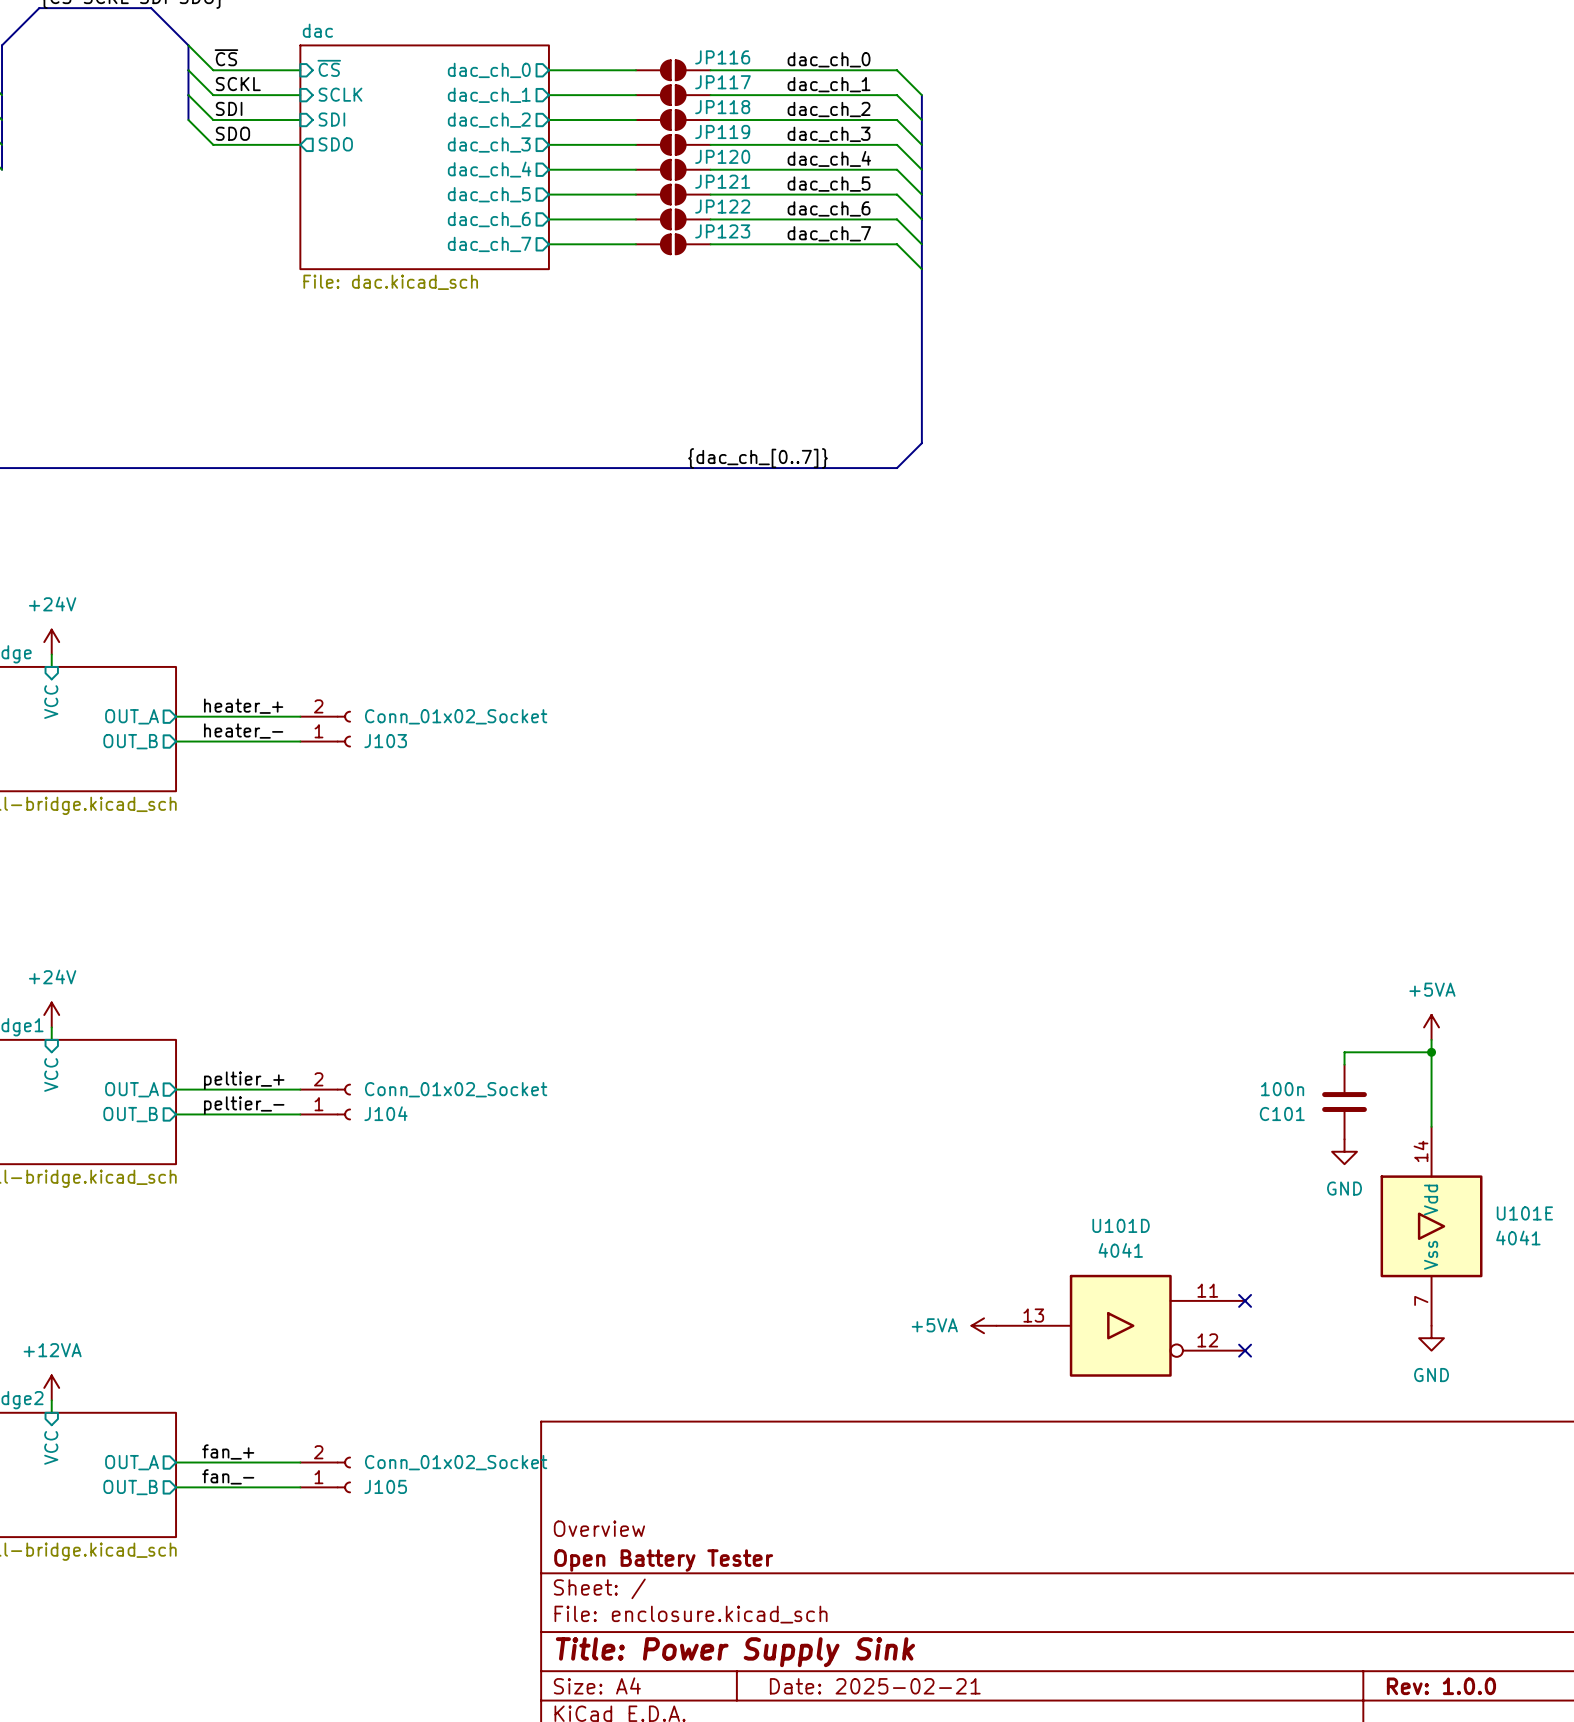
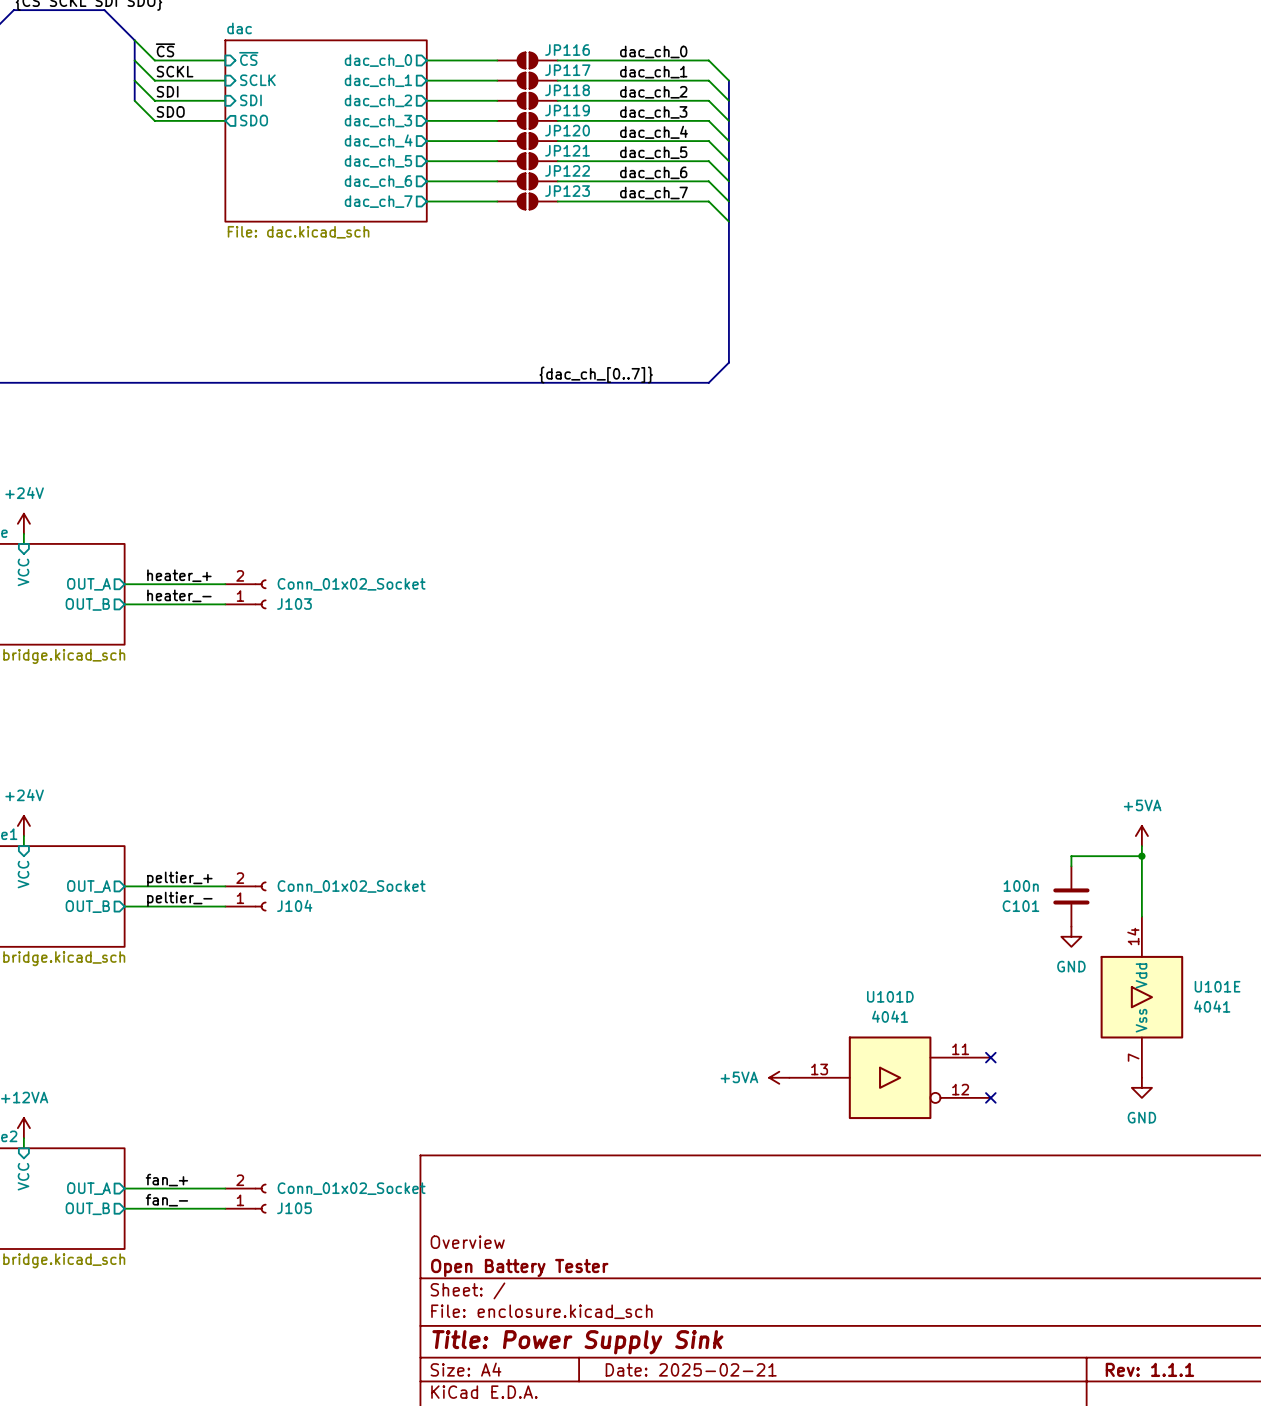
title block: Rev: 1.0.0 (1441, 1686) -> Rev: 1.1.1 (1149, 1369)

